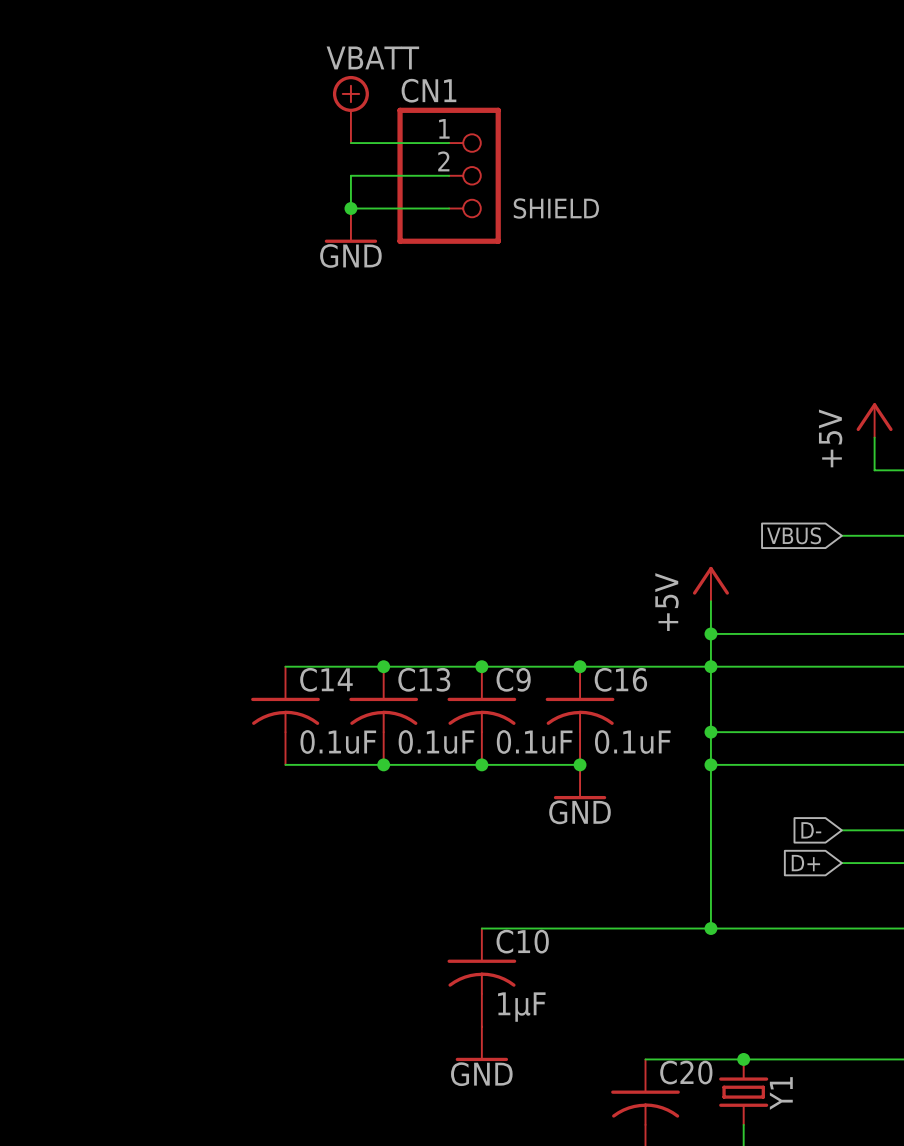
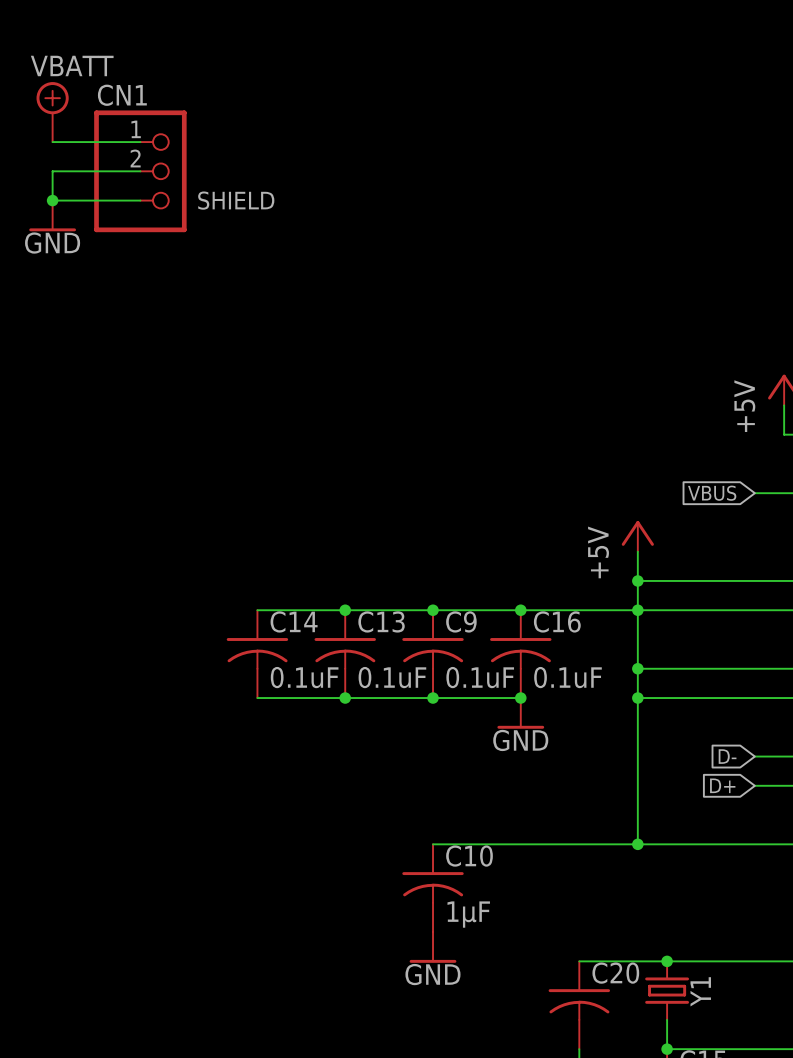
power symbol position: VBATT (350, 109) -> VBATT (52, 112)
wire: (350, 143) (449, 143) -> (52, 142) (140, 142)
wire: (449, 175) (350, 175) (350, 208) (449, 208) -> (140, 171) (52, 171) (52, 200) (140, 200)
CN1 position: (449, 175) -> (140, 171)
junction: none -> (52, 200)
junction: (350, 208) -> none
power symbol: none -> GND (52, 215)
power symbol: GND (350, 225) -> none

